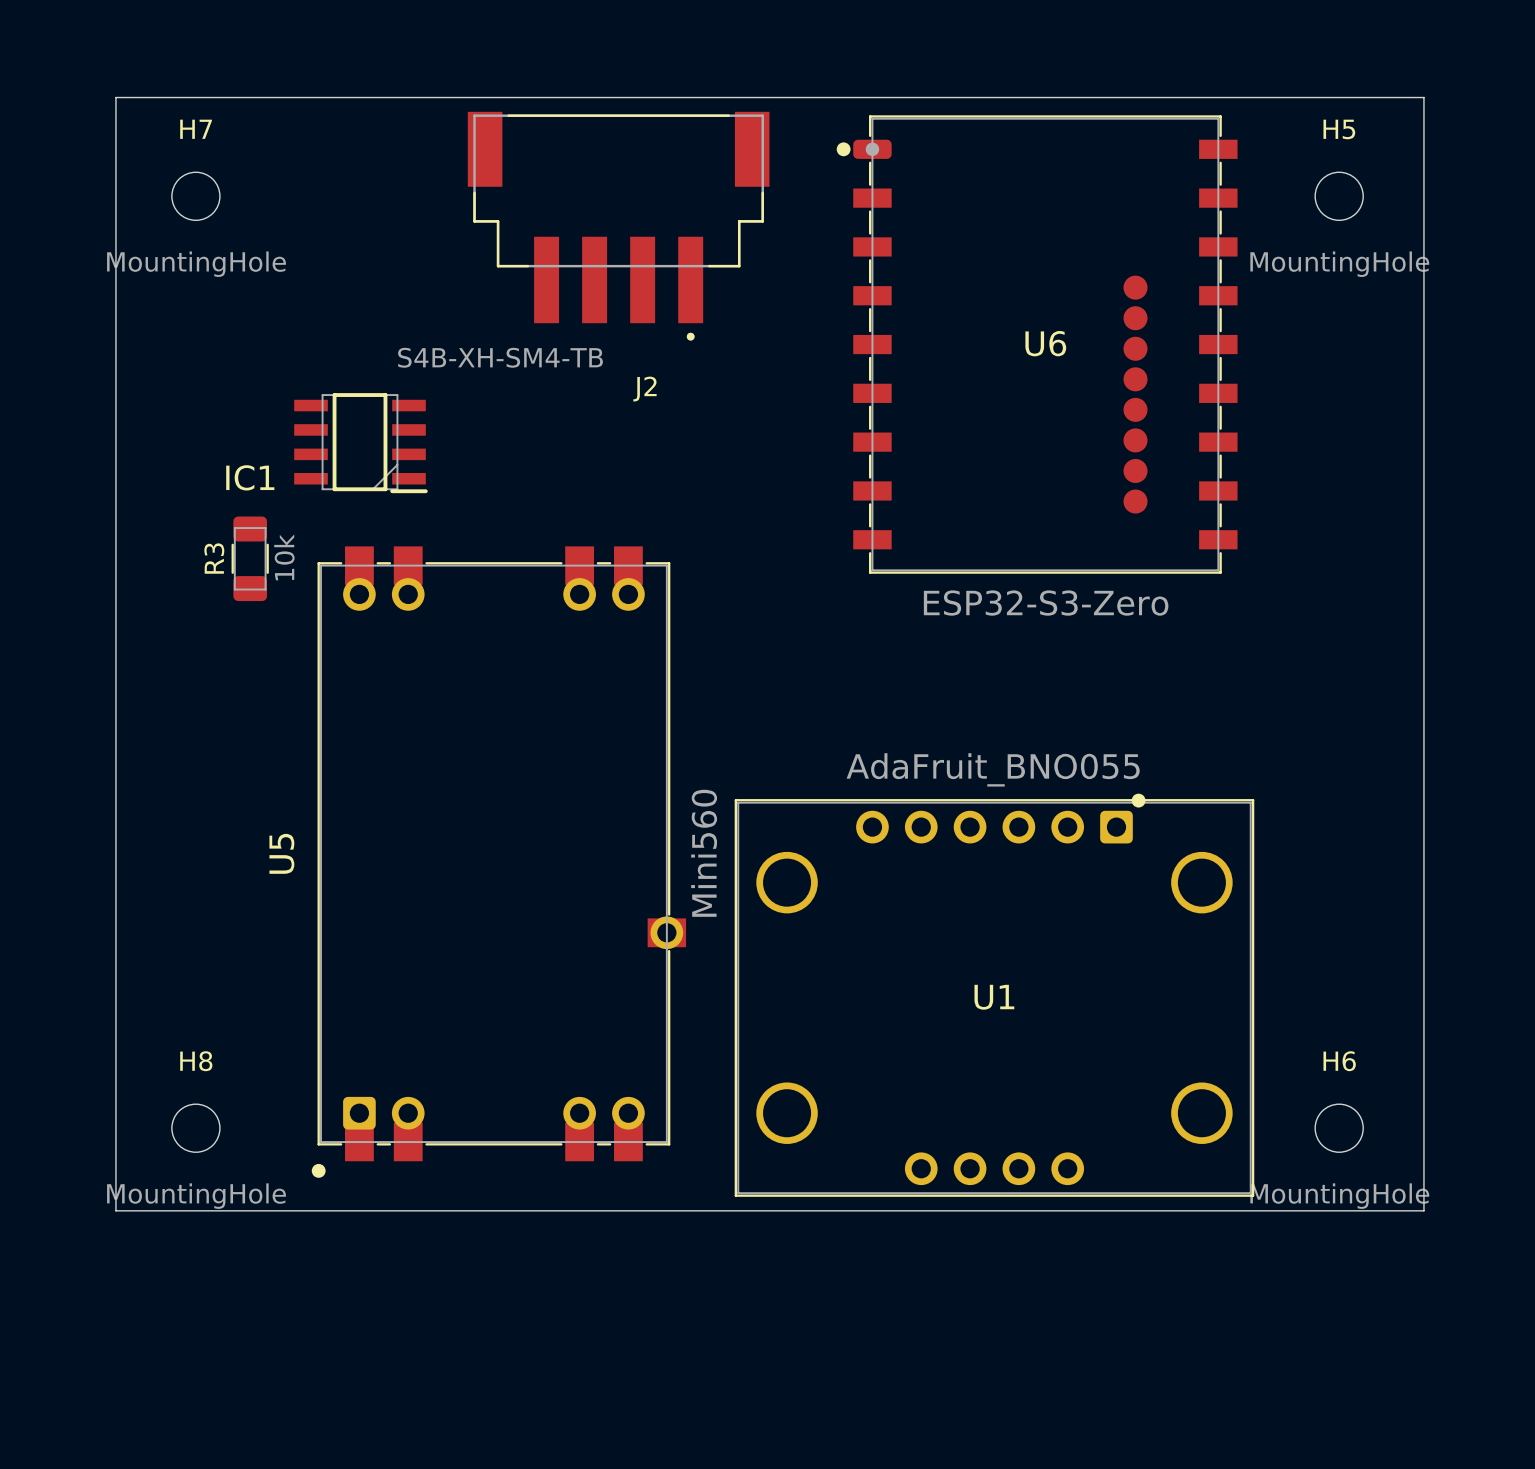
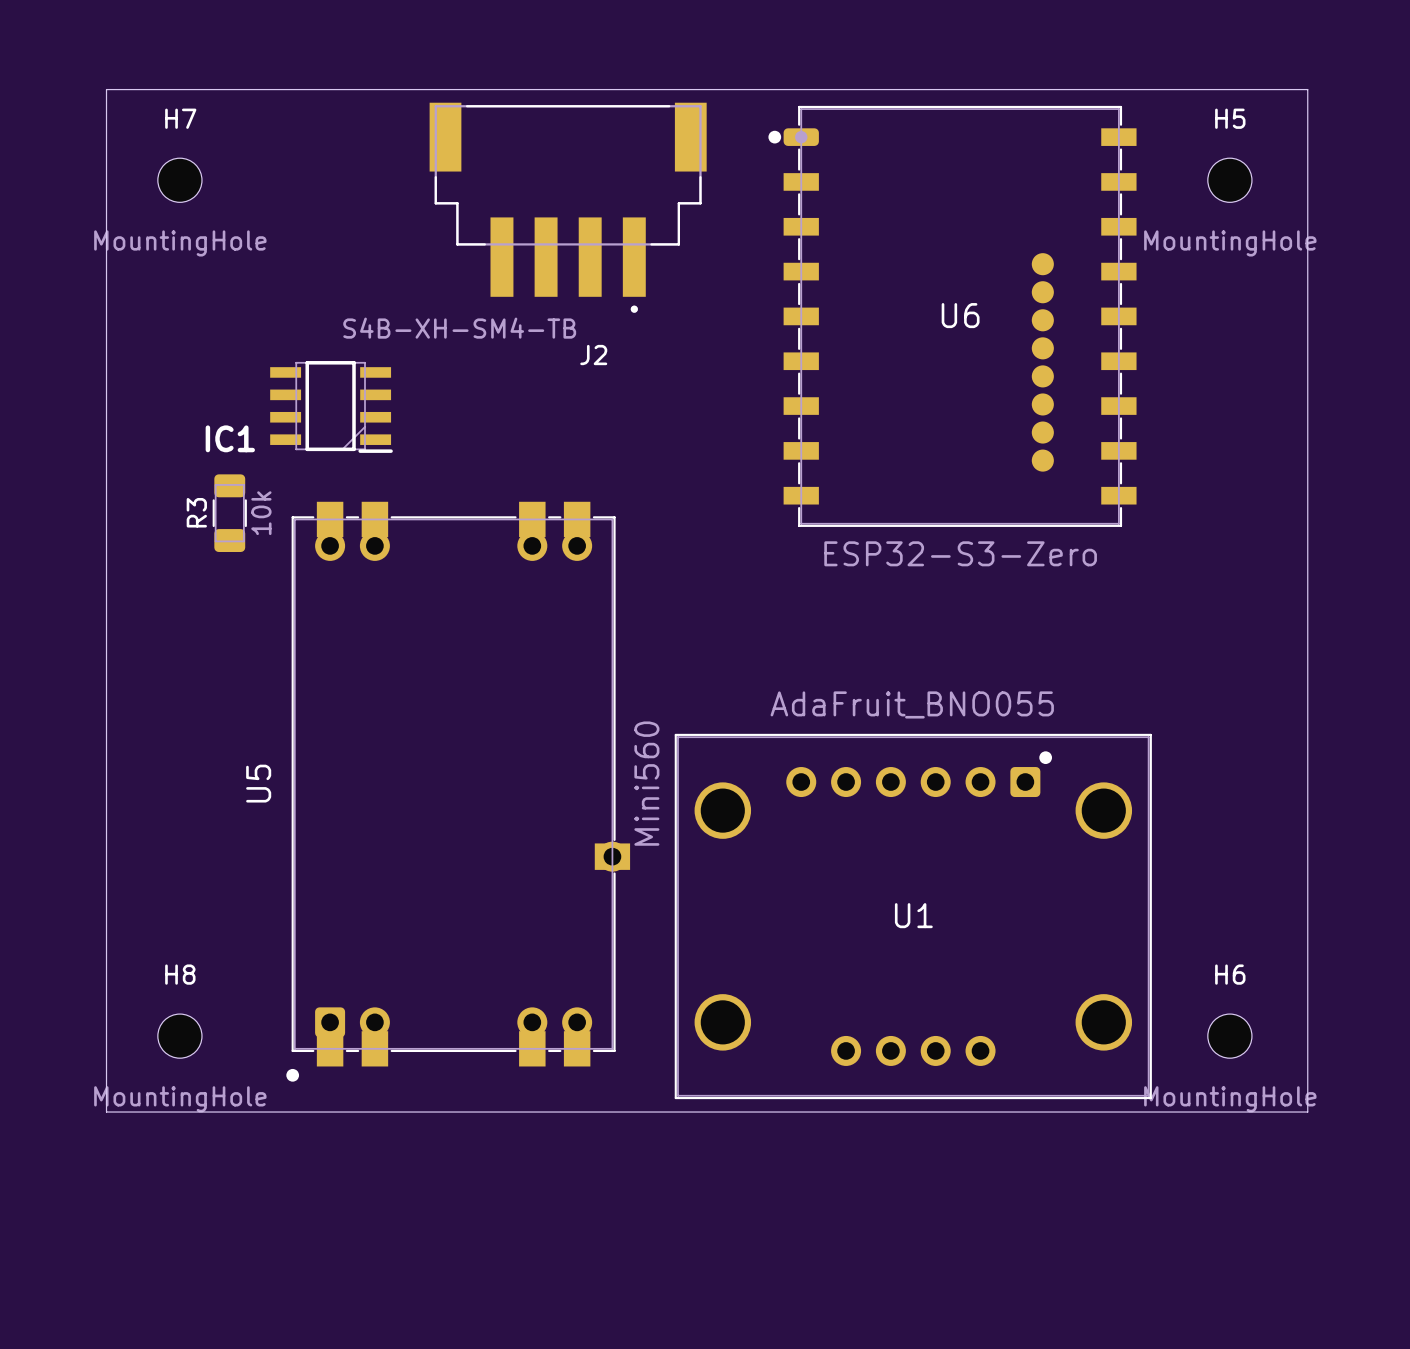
U1 footprint: [734, 793, 1255, 1197] -> [674, 733, 1152, 1100]

